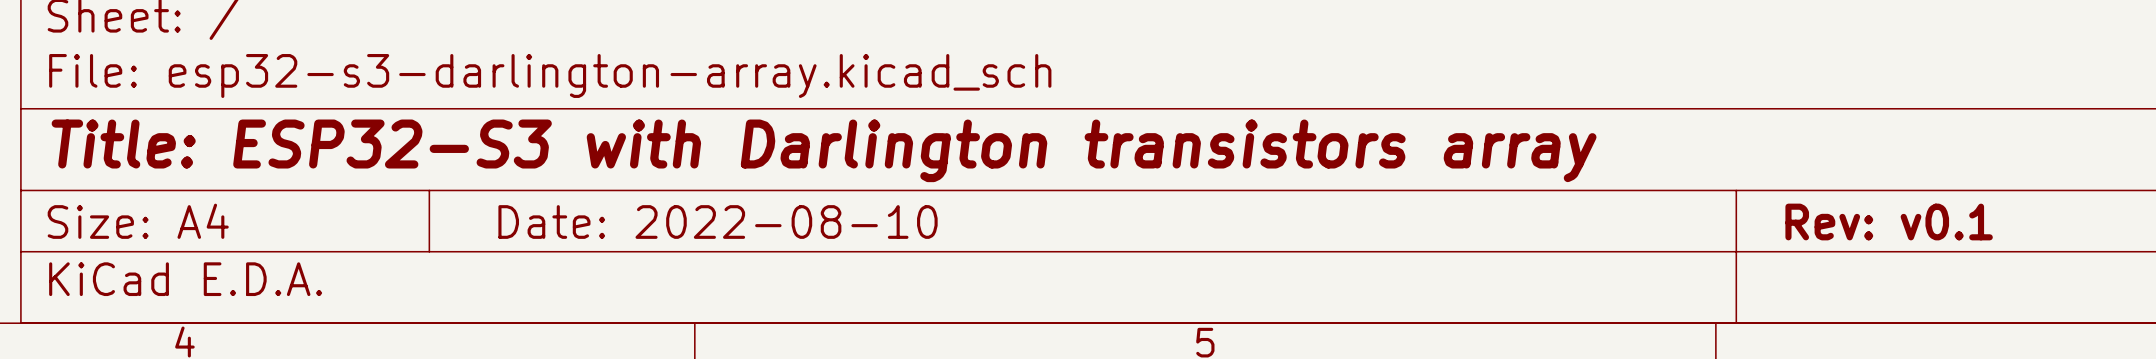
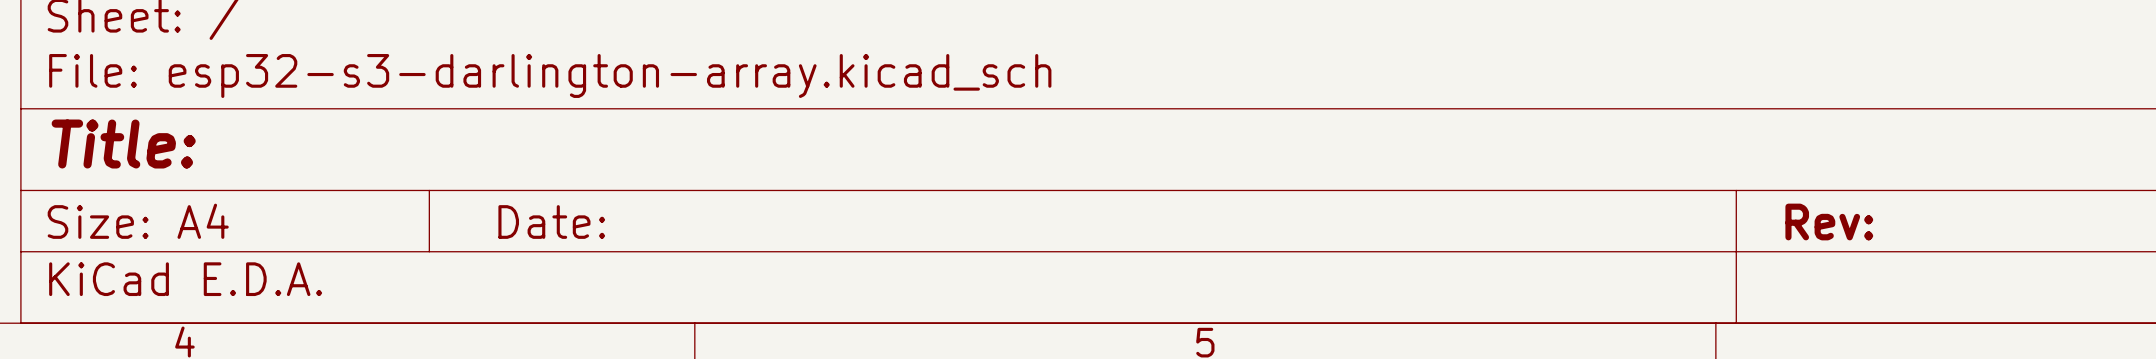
title block: Title: ESP32-S3 with Darlington transistors array (824, 150) -> Title: (123, 144)
title block: Date: 2022-08-10 (718, 222) -> Date: (551, 222)
title block: Rev: v0.1 (1889, 222) -> Rev: (1829, 222)

